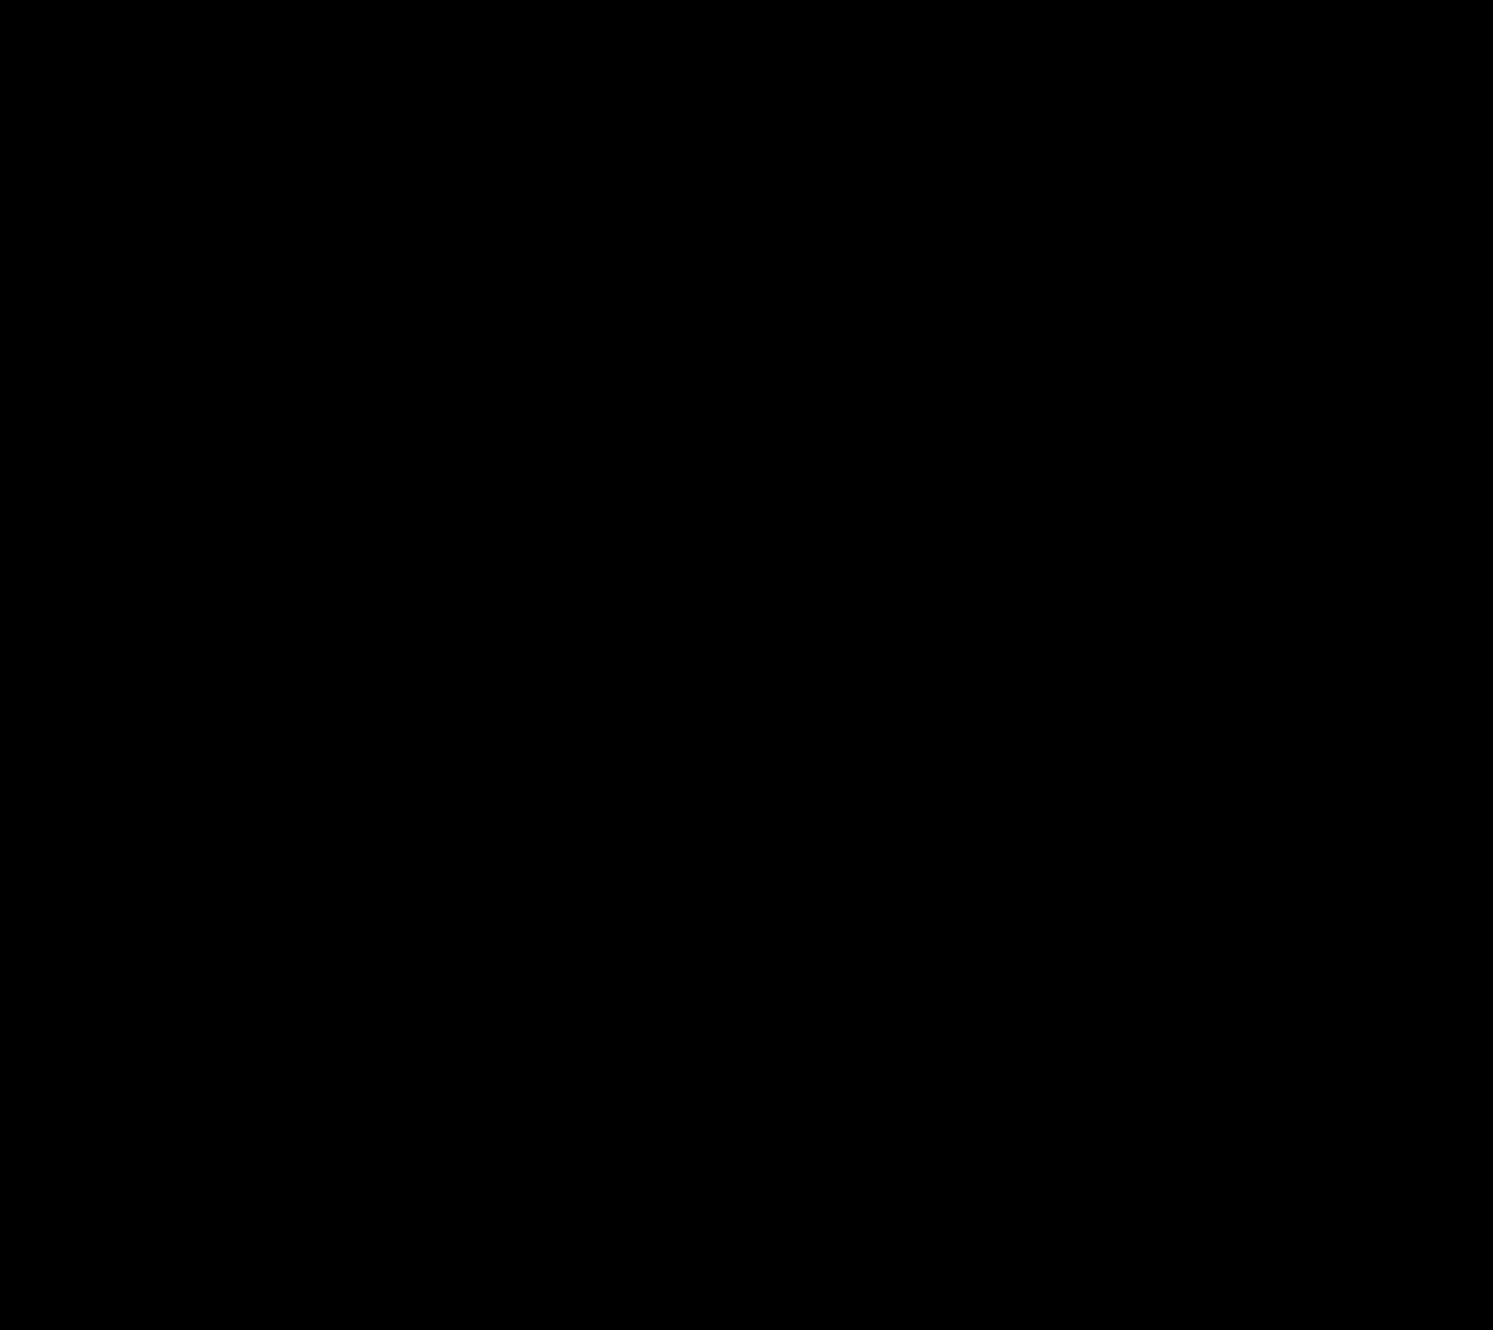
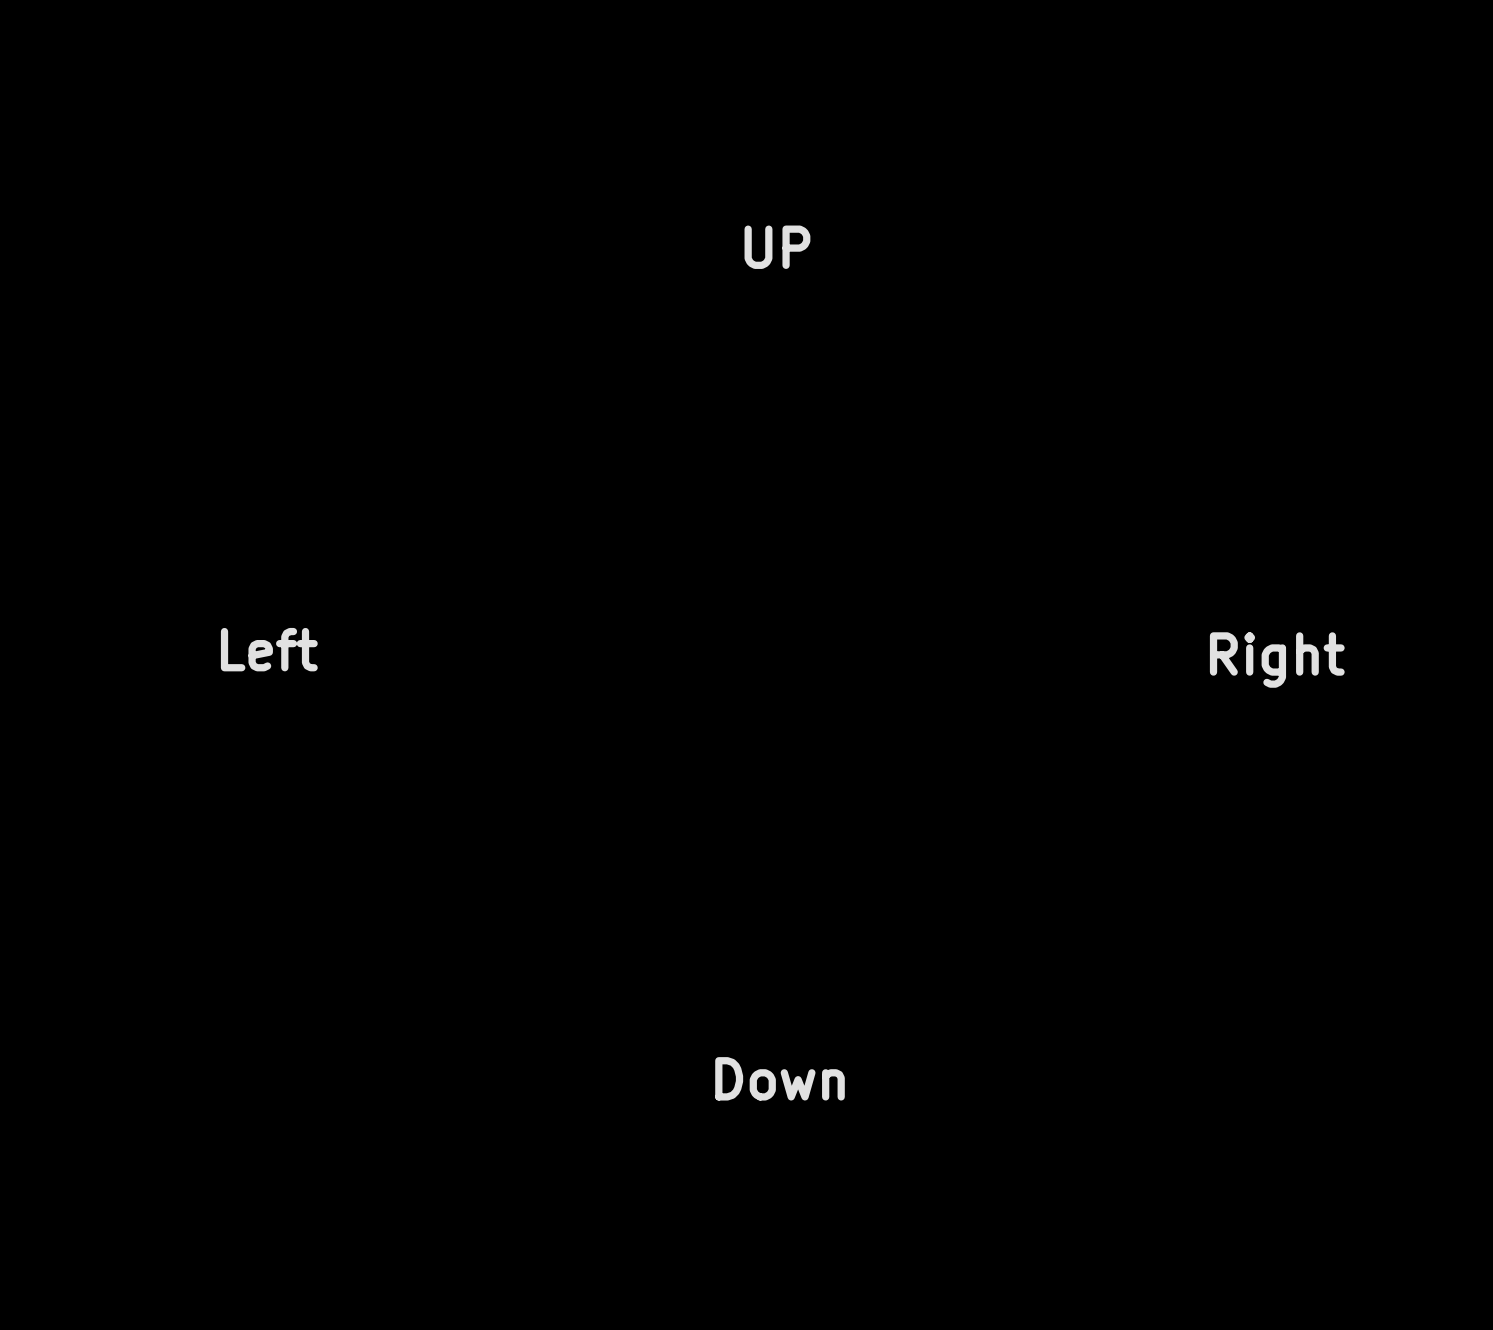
text: none -> UP (777, 247)
text: none -> Left (269, 649)
text: none -> Right (1277, 660)
text: none -> Down (780, 1078)

